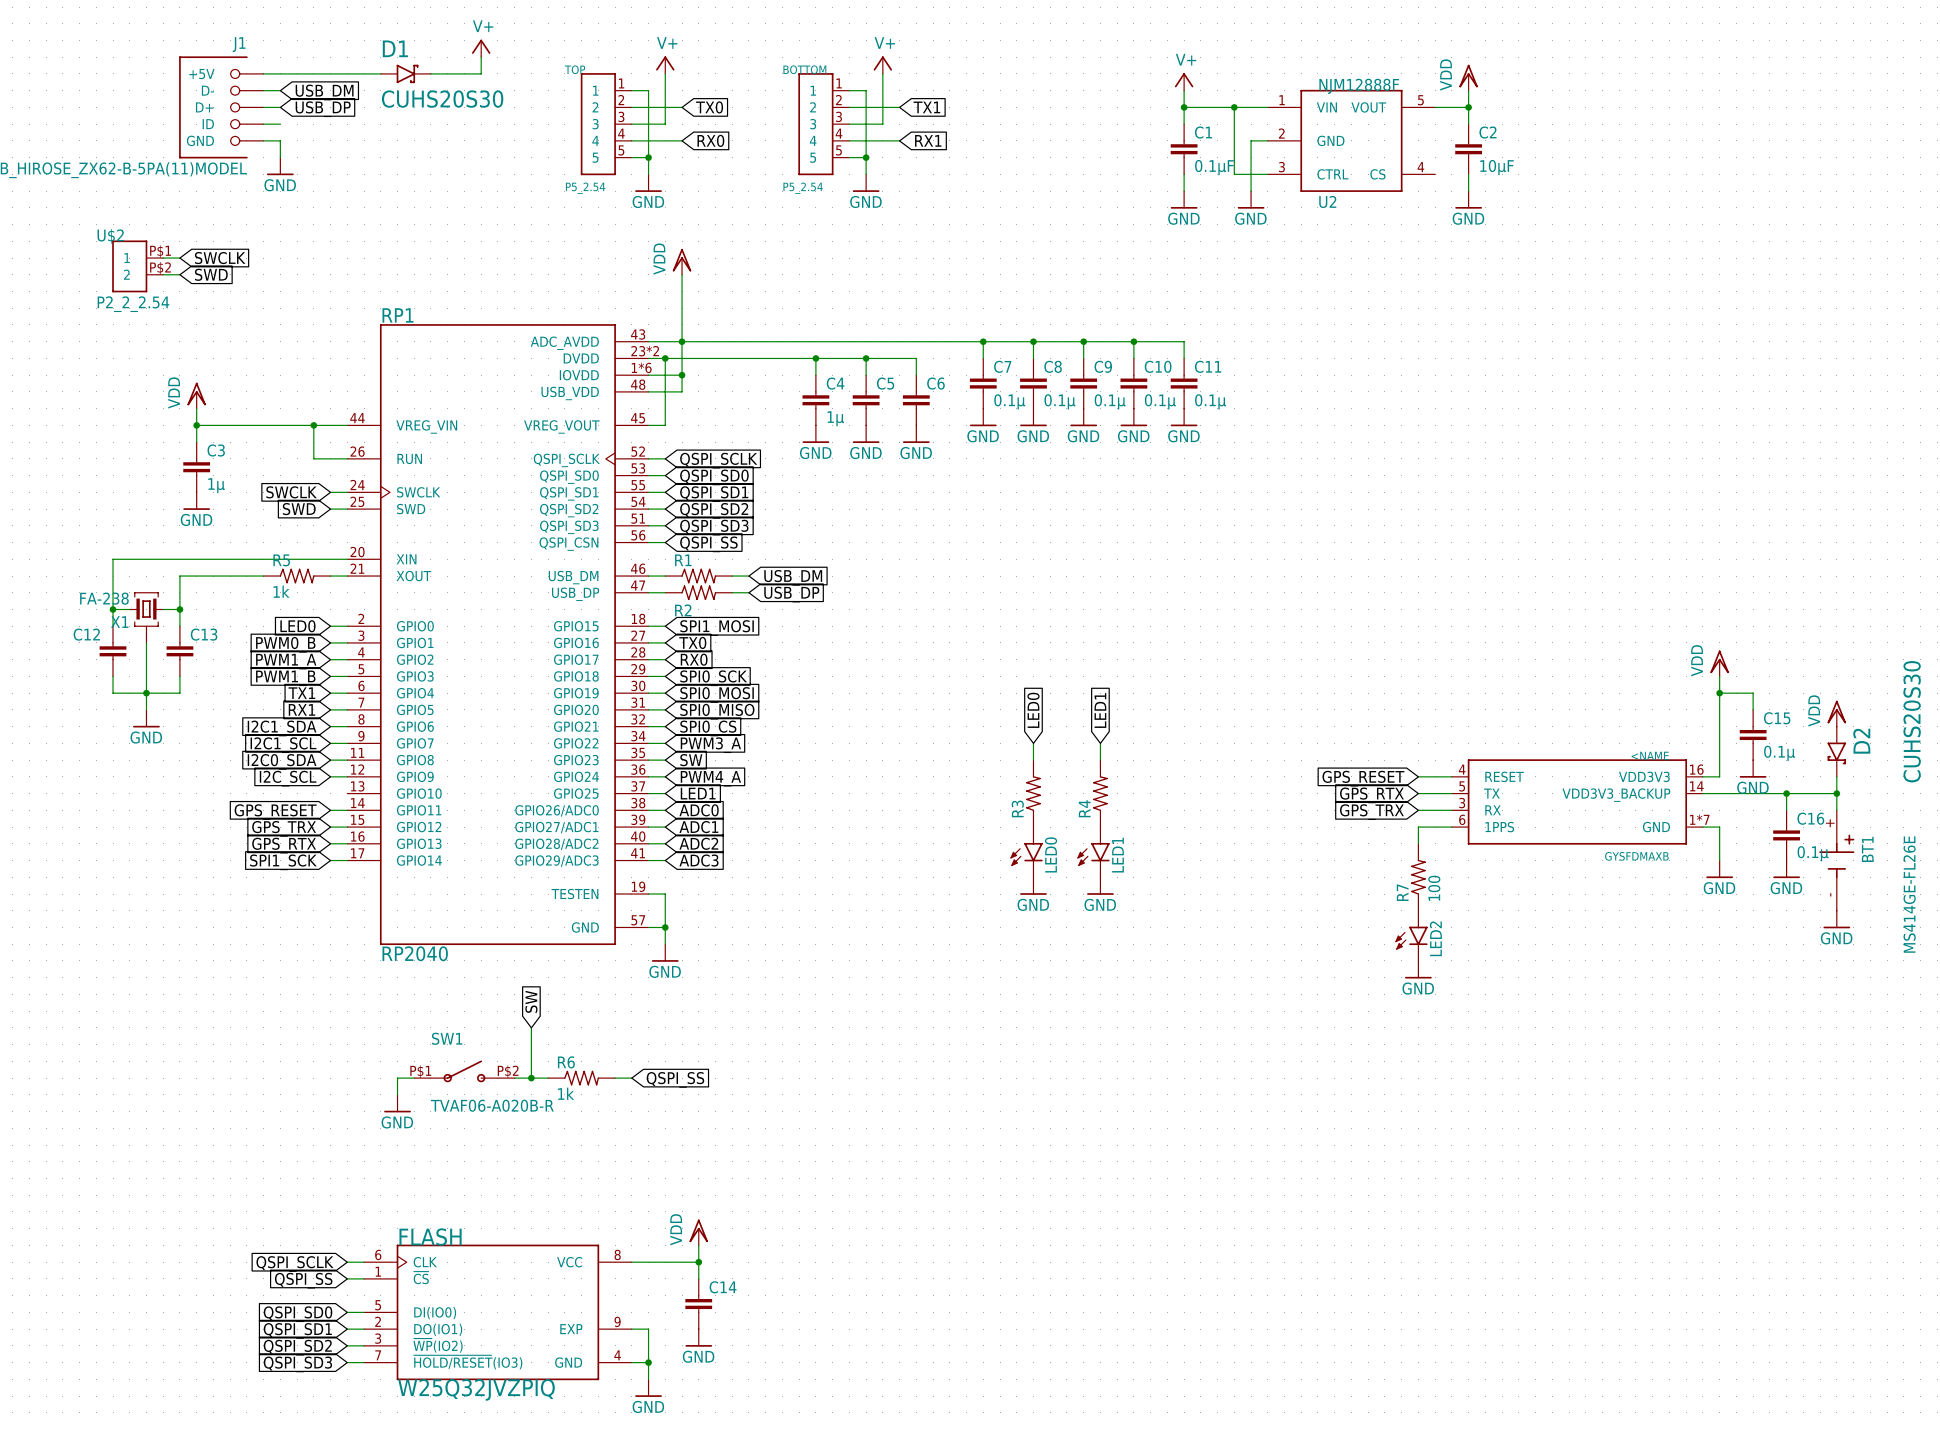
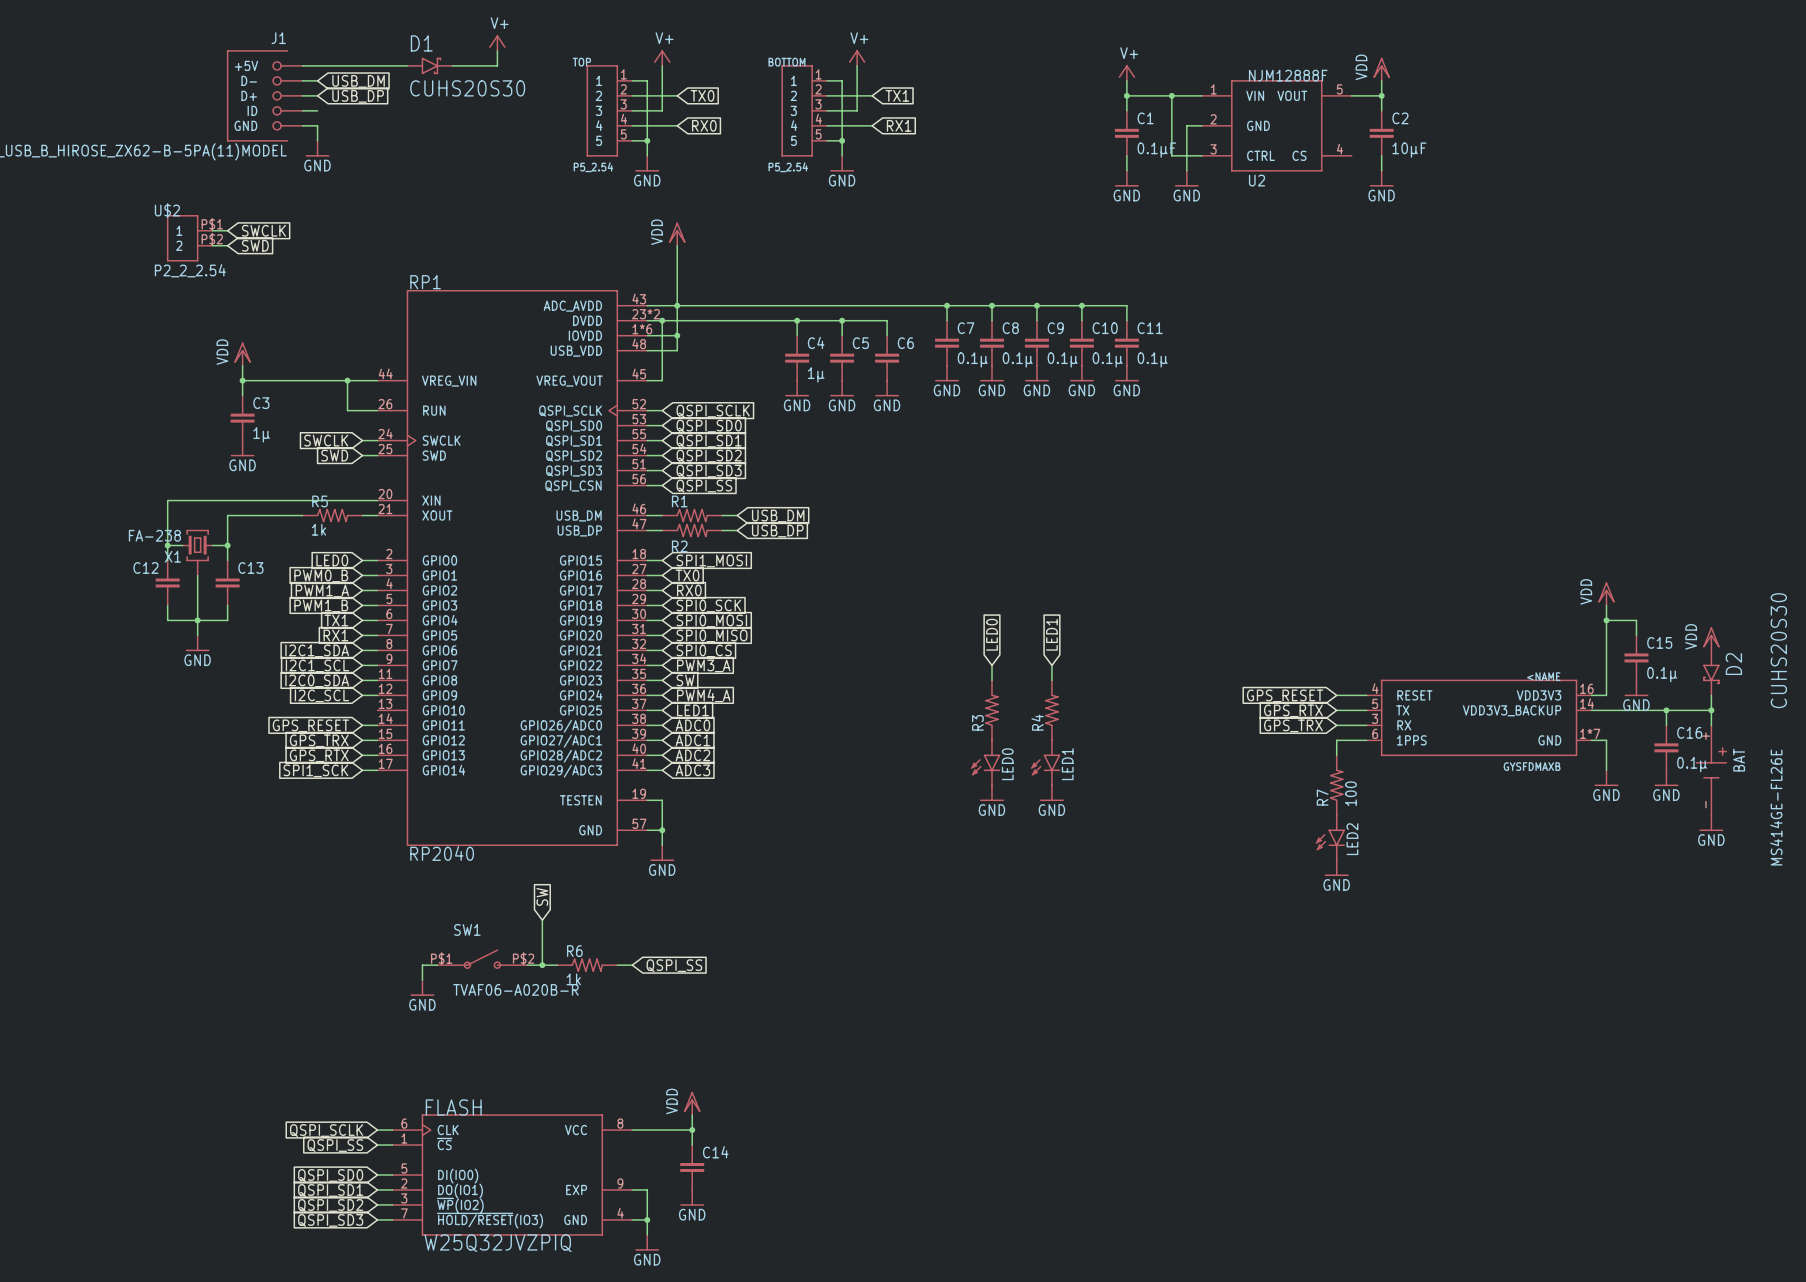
BT1 name: BT1 (1867, 849) -> BAT (1739, 760)

